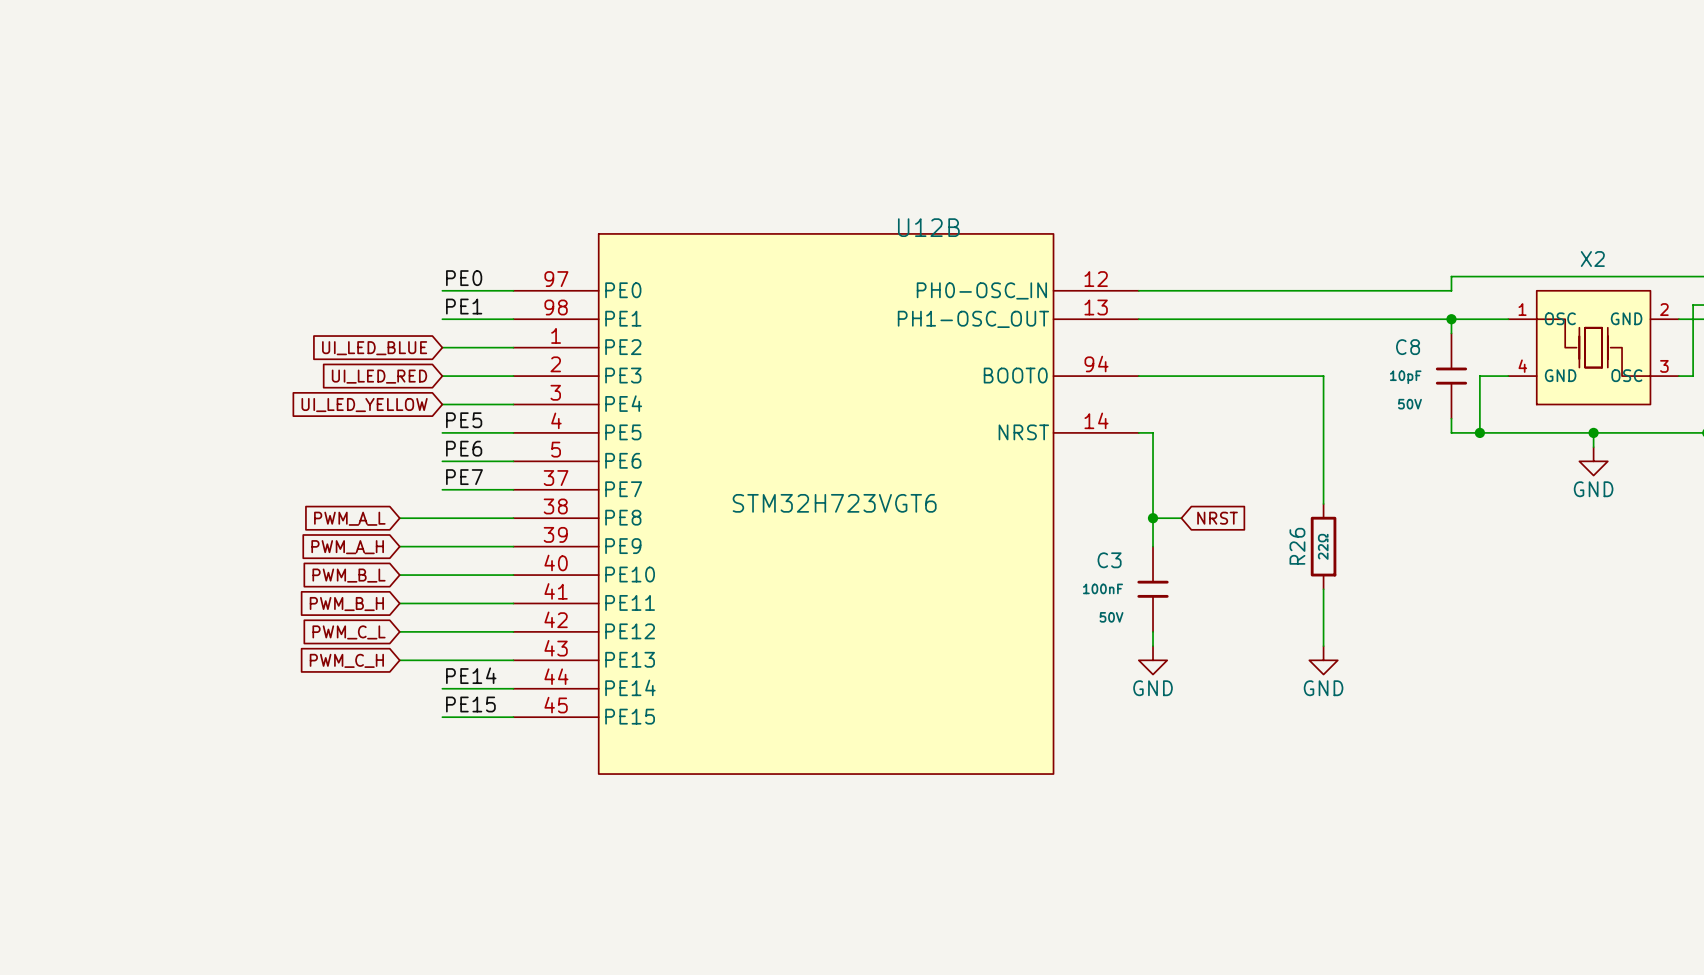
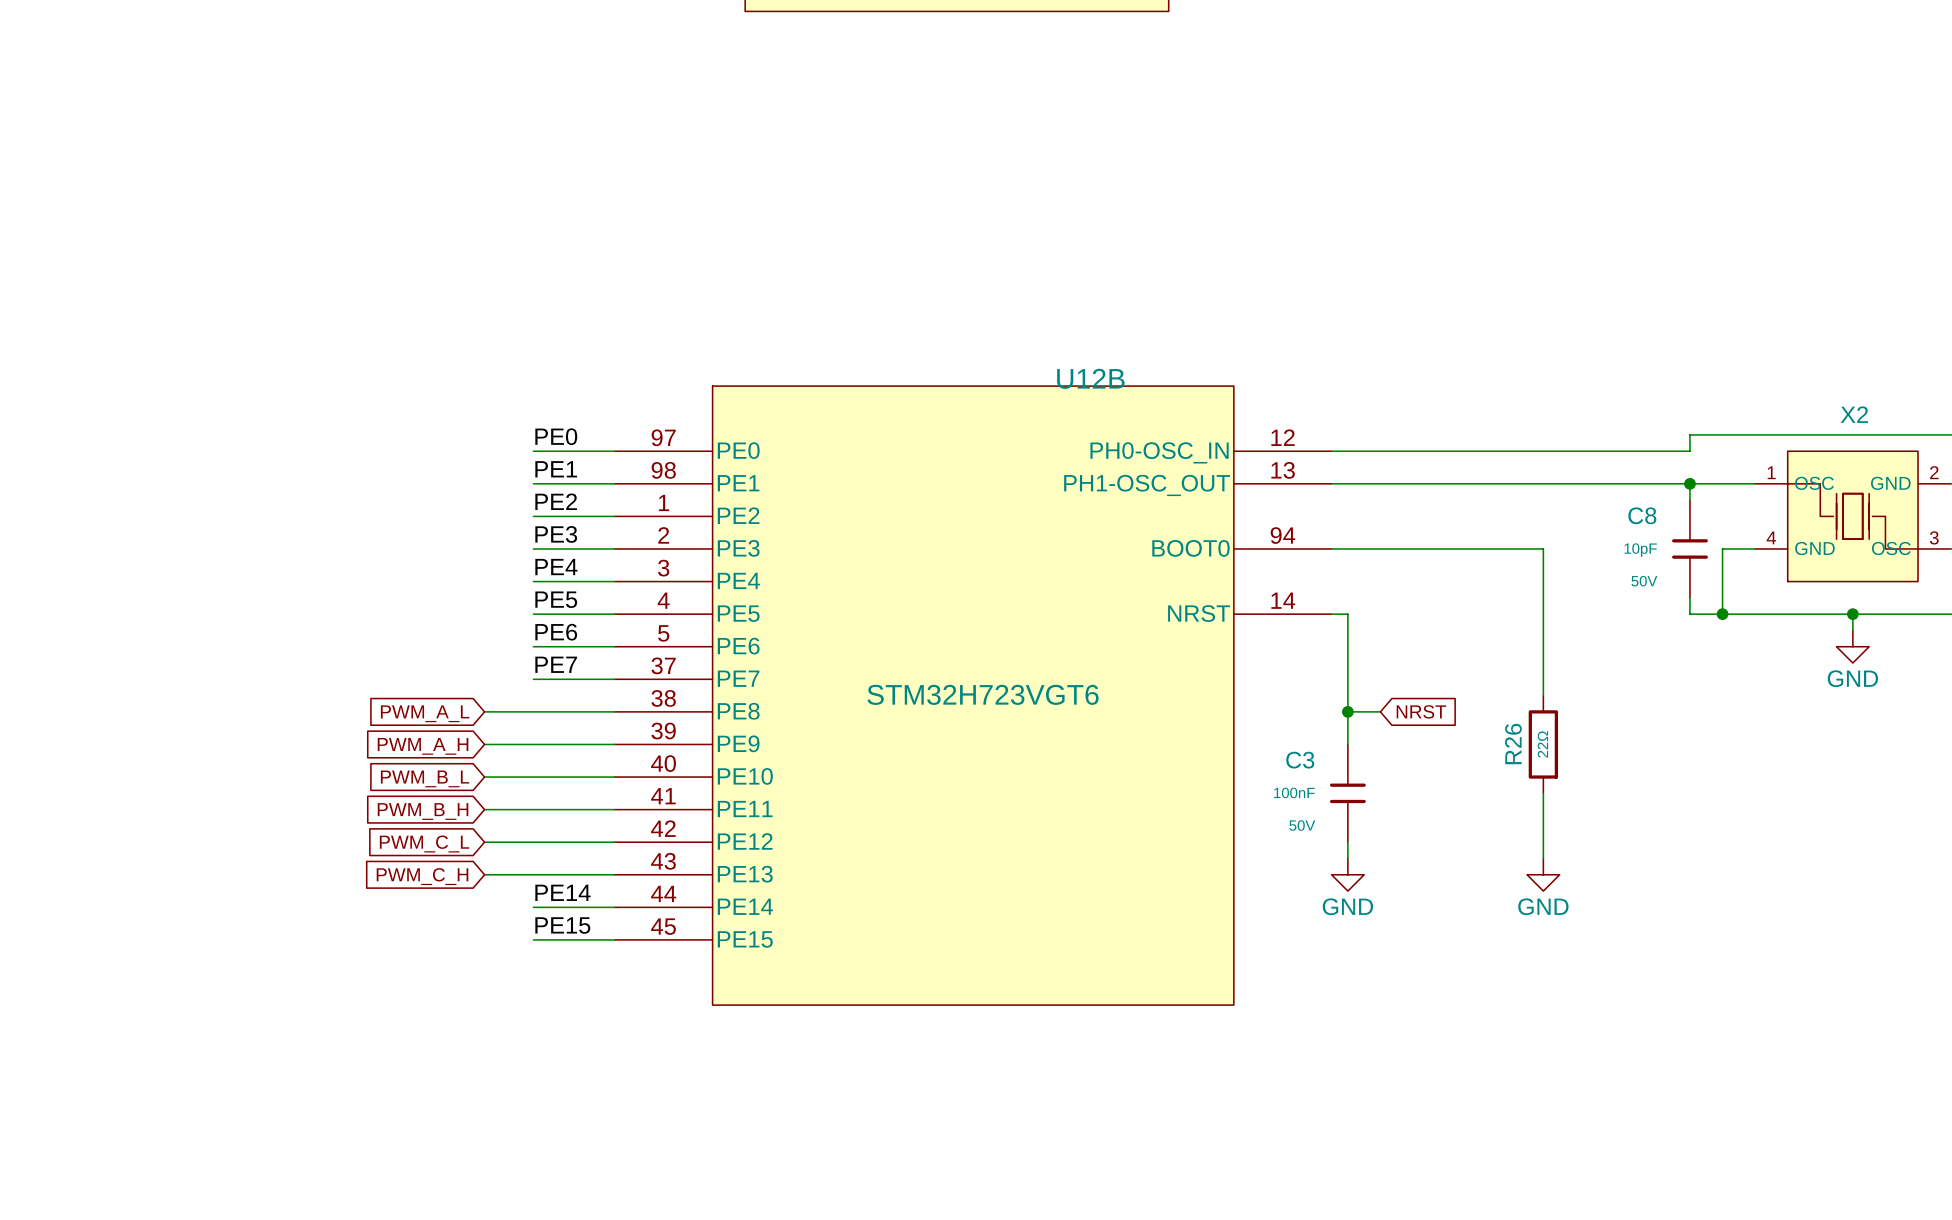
label: none -> PE2 (556, 501)
global label: UI_LED_BLUE (374, 348) -> none
label: none -> PE3 (556, 534)
global label: UI_LED_RED (379, 376) -> none
label: none -> PE4 (556, 567)
global label: UI_LED_YELLOW (364, 405) -> none

